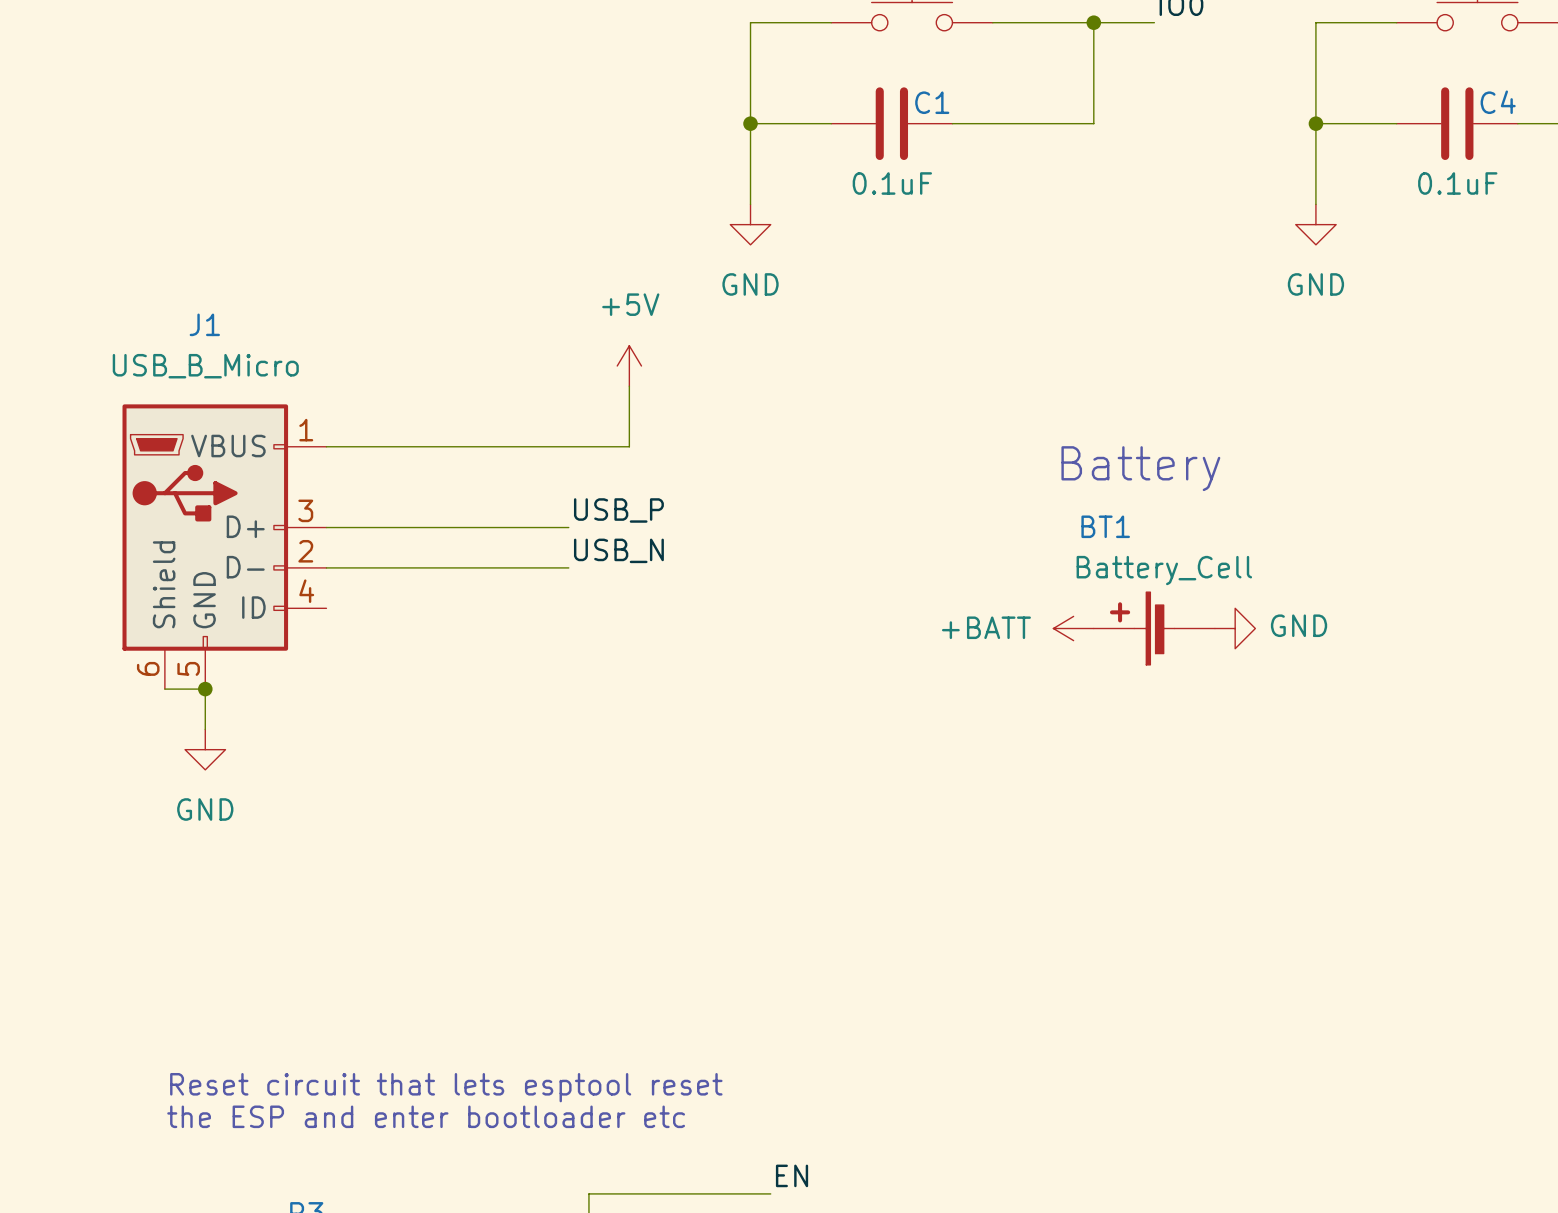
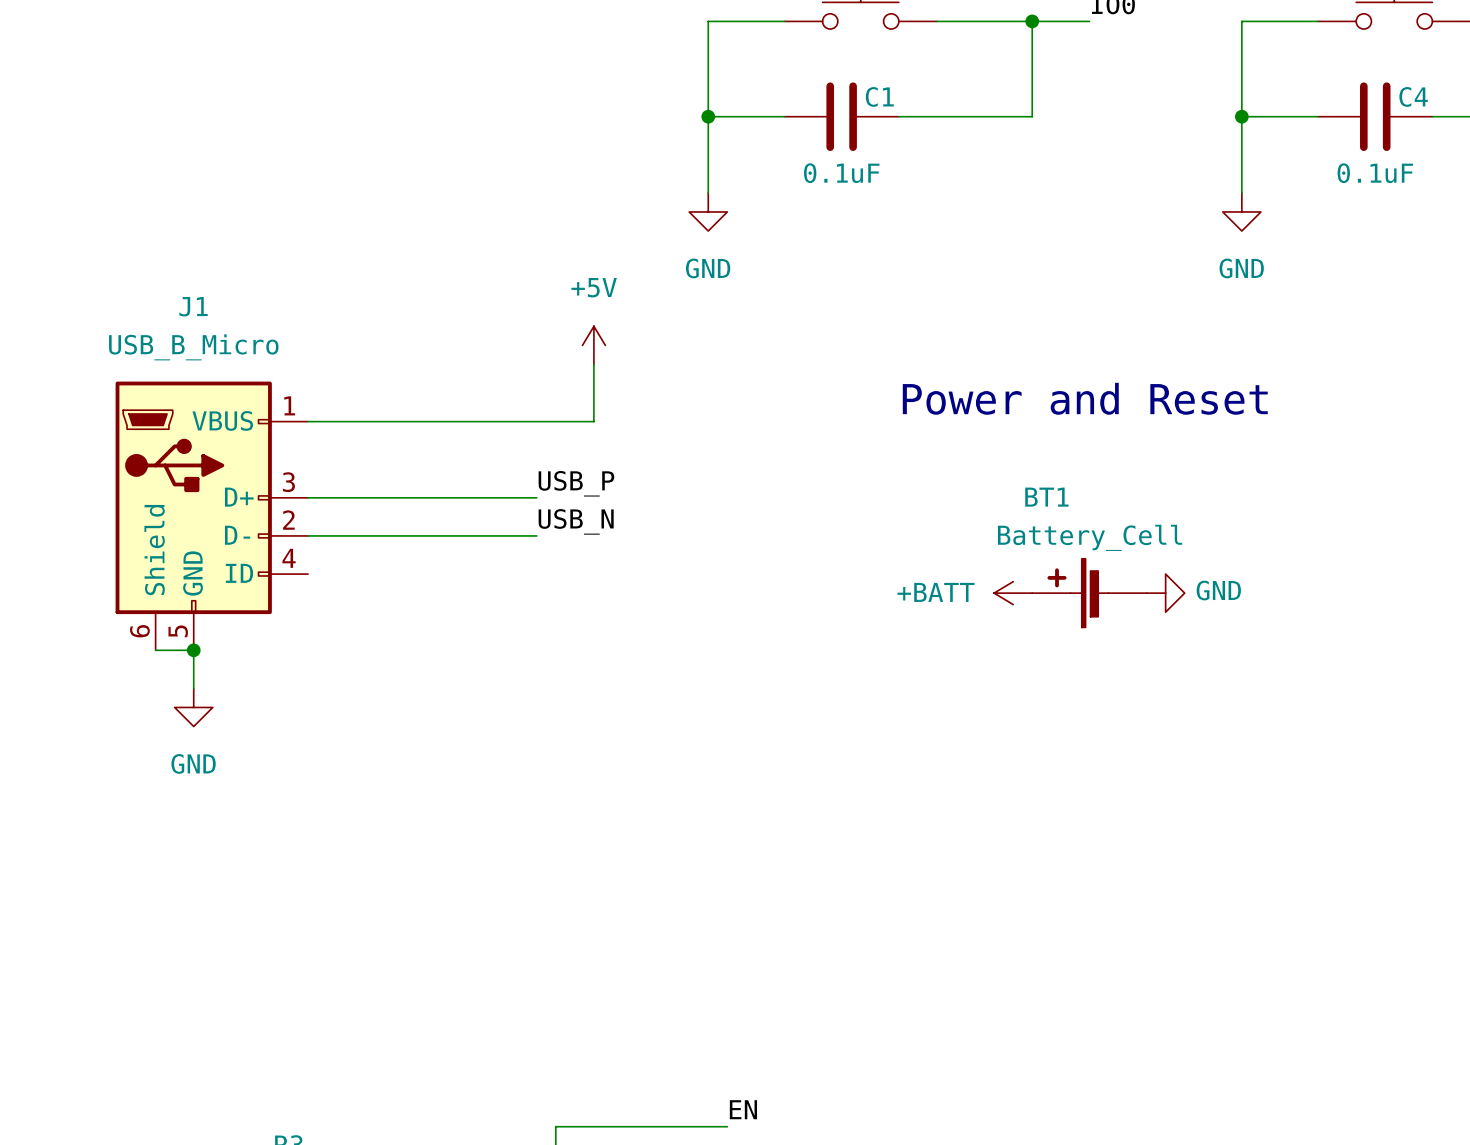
text: none -> Power and Reset (1085, 398)
text: Battery (1140, 468) -> none
text: Reset circuit that lets esptool reset (446, 1087) -> none
text: the ESP and enter bootloader etc (426, 1116) -> none

